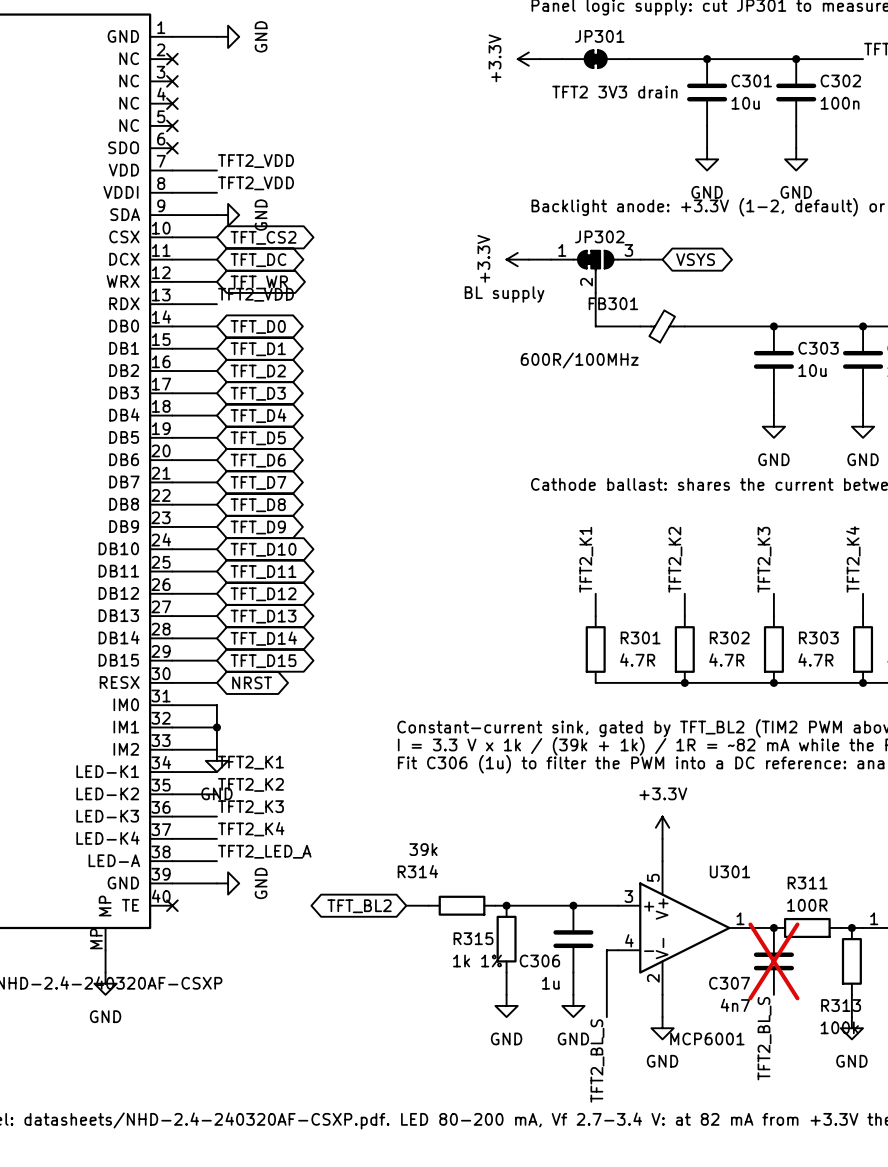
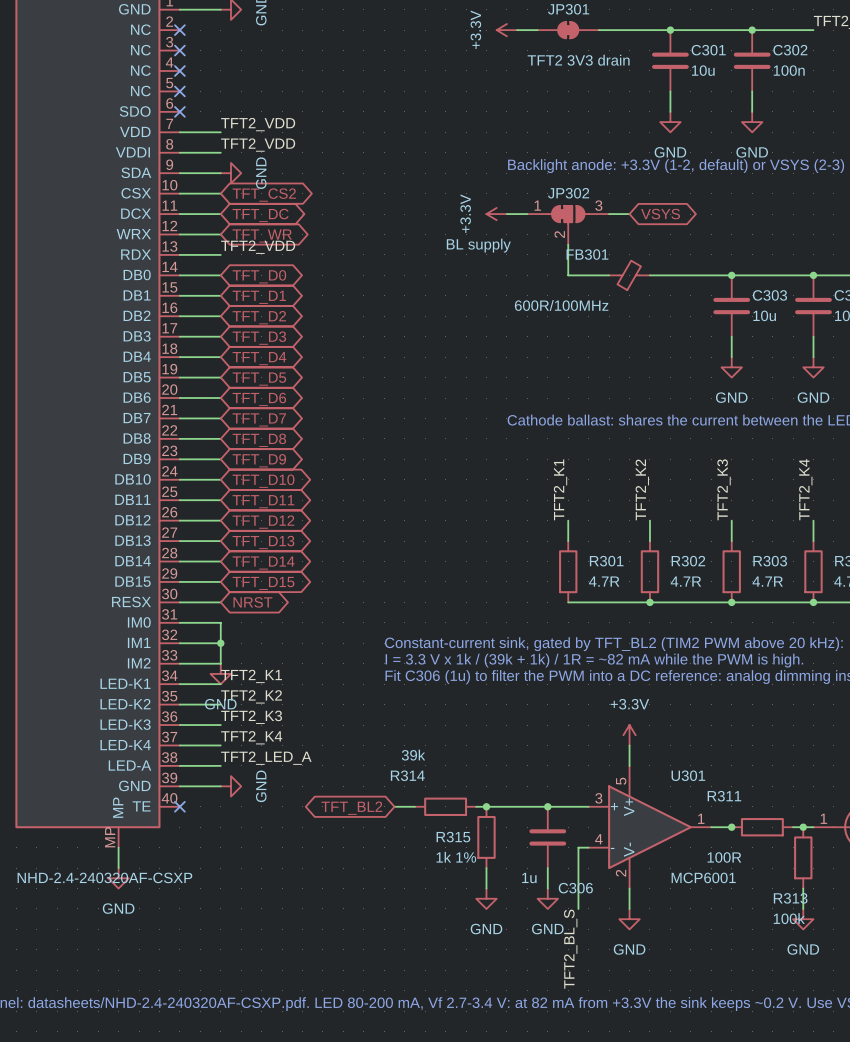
R311 name position: R311 (807, 883) -> R311 (724, 796)
R311 value position: 100R (807, 905) -> 100R (724, 857)
C306 name position: C306 (539, 960) -> C306 (575, 888)
C307: 4n7 (773, 961) -> none
U301 value position: MCP6001 (707, 1038) -> MCP6001 (703, 877)
label: TFT2_BL_S (764, 1038) -> none

